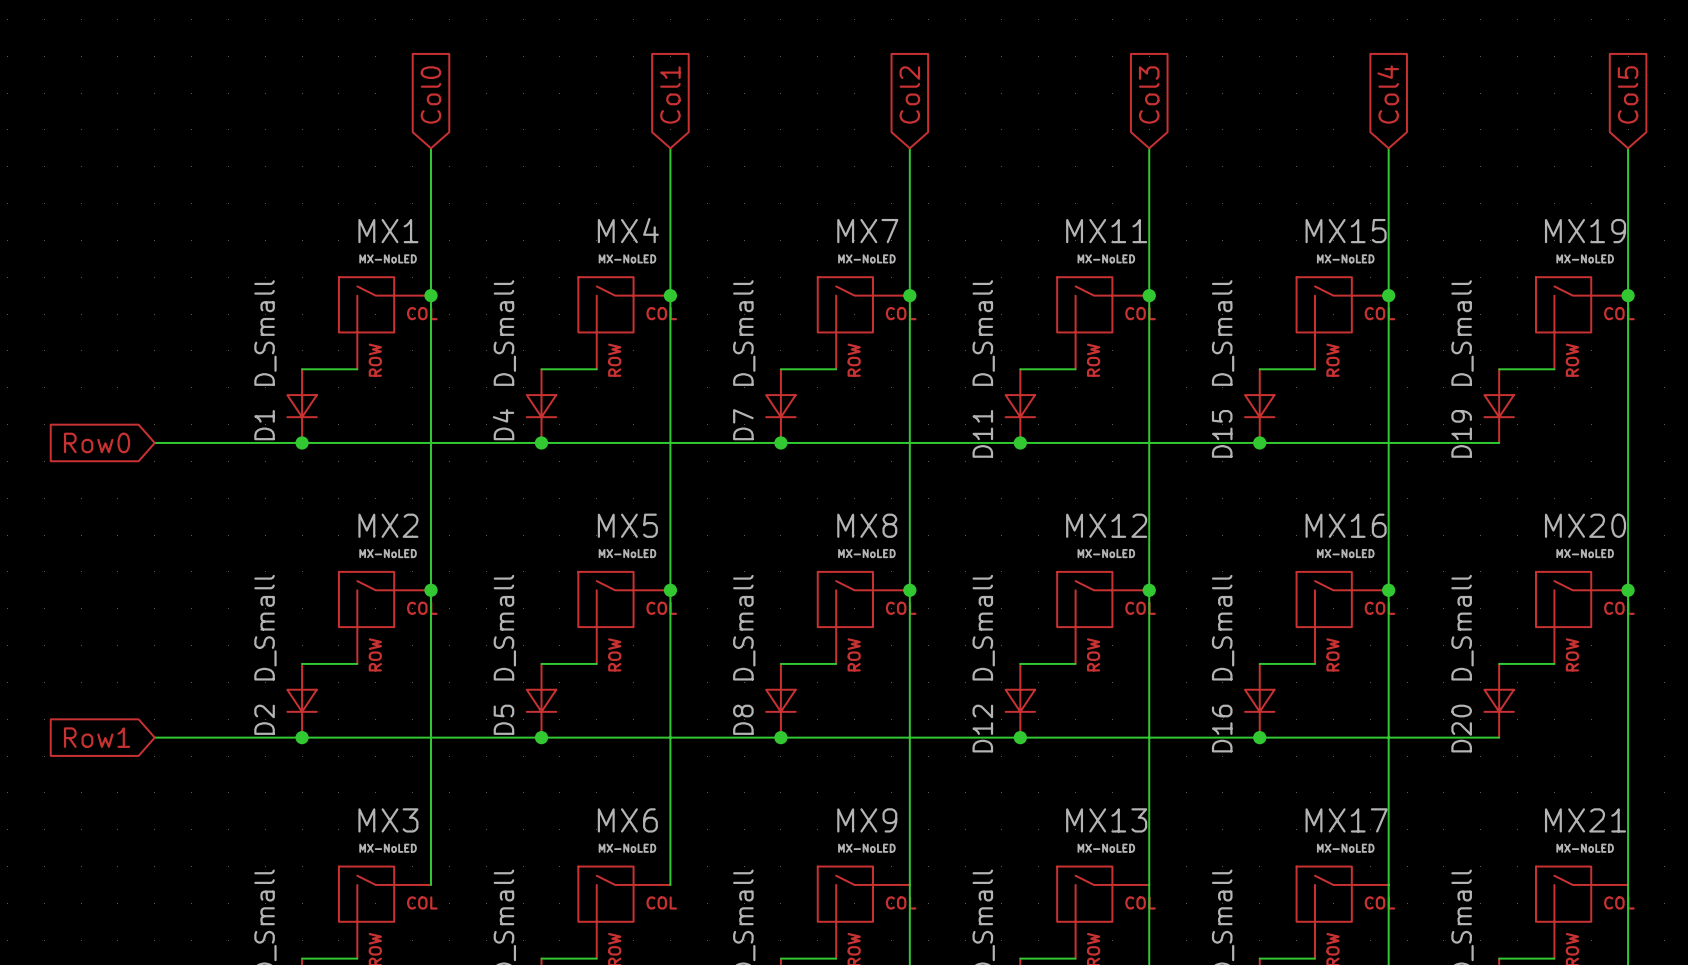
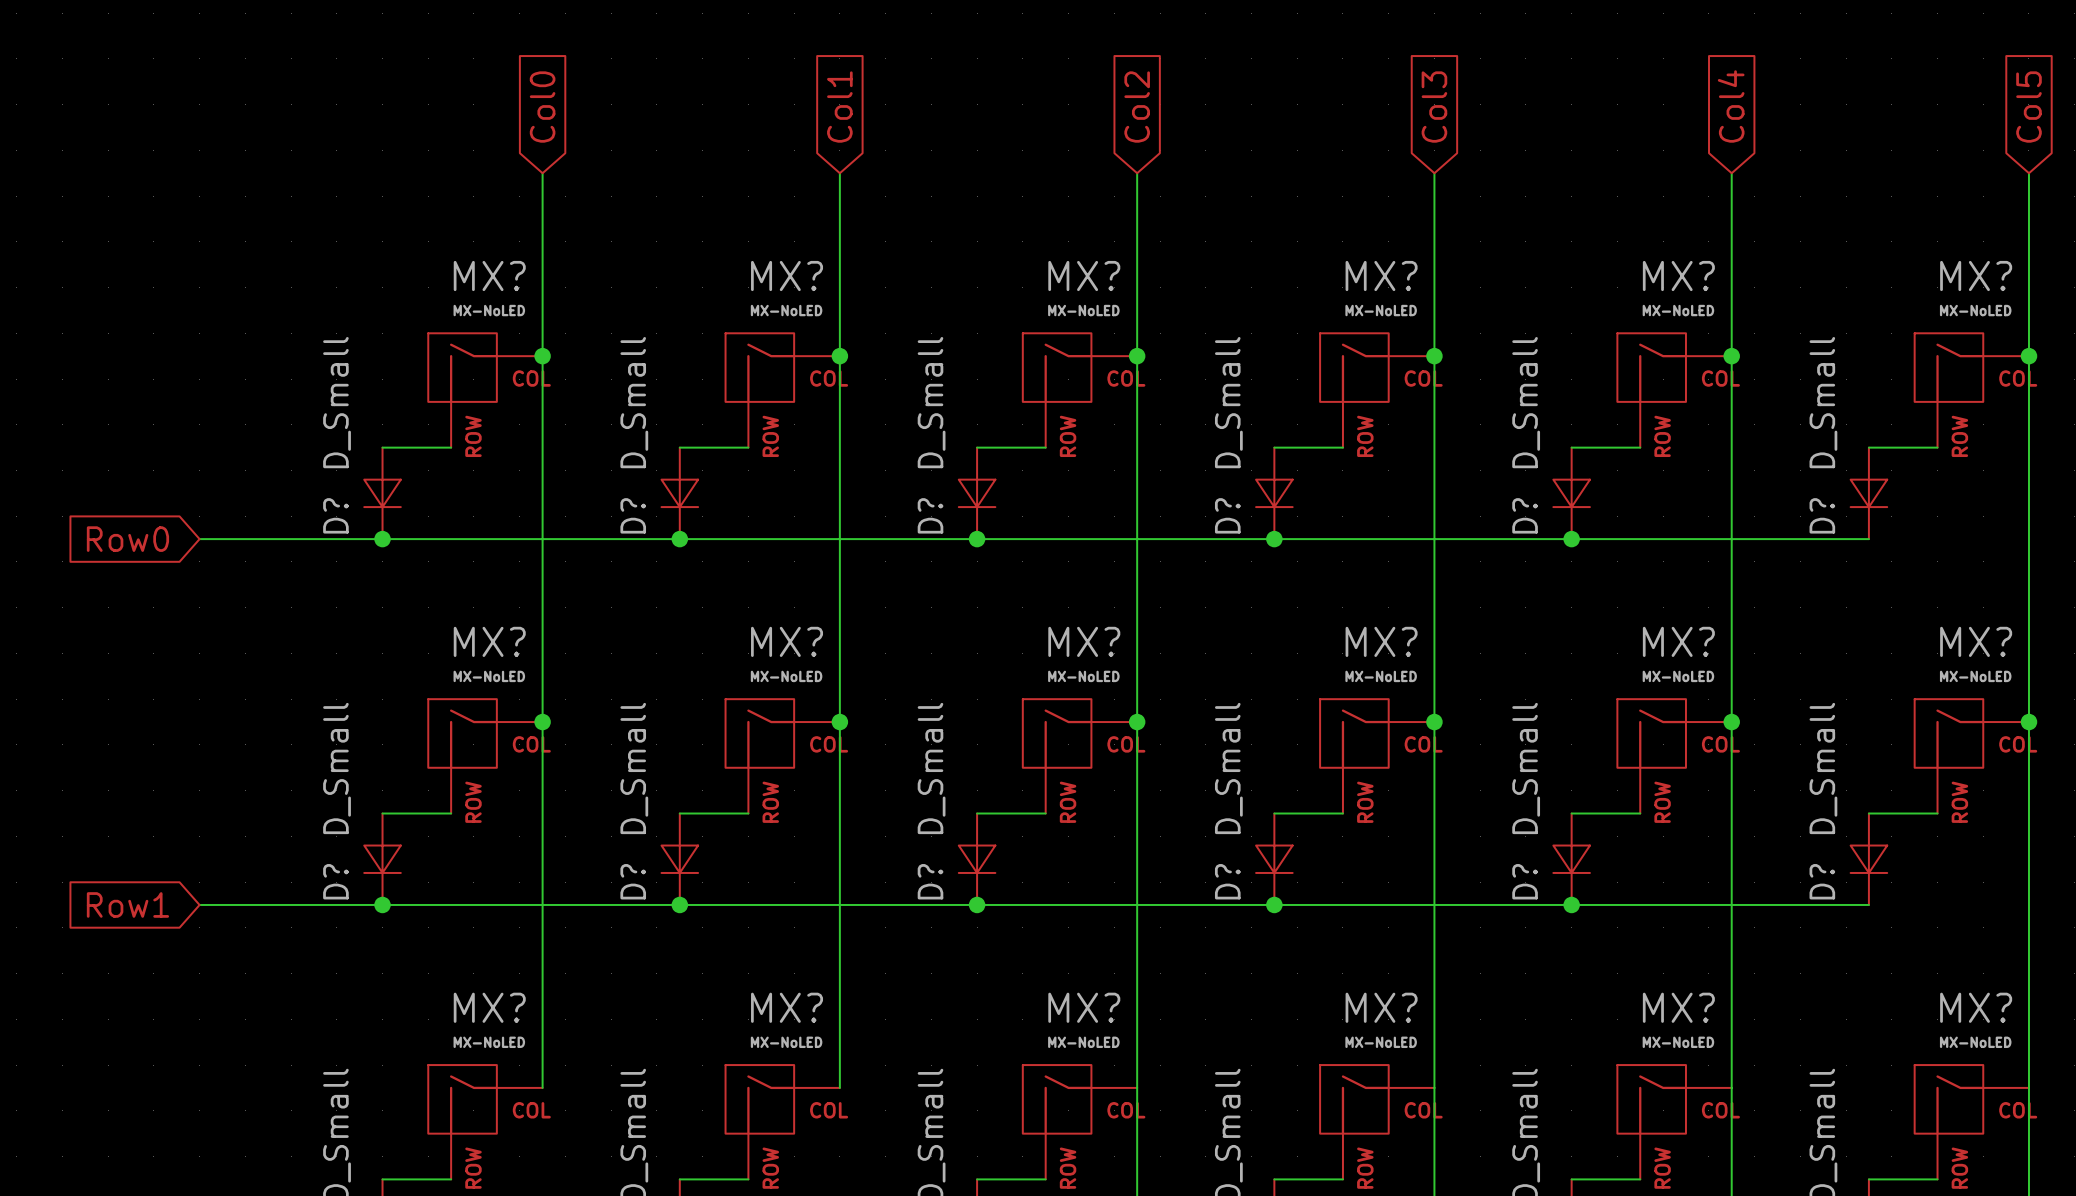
MX4 name: MX4 (628, 230) -> MX? (787, 276)
MX1 name: MX1 (388, 231) -> MX? (489, 276)
MX7 name: MX7 (867, 231) -> MX? (1084, 276)
MX11 name: MX11 (1106, 231) -> MX? (1381, 276)
MX15 name: MX15 (1346, 231) -> MX? (1678, 276)
MX19 name: MX19 (1585, 231) -> MX? (1976, 276)
D4 name: D4 (503, 424) -> D? (633, 515)
D7 name: D7 (743, 424) -> D? (930, 515)
D1 name: D1 (264, 425) -> D? (335, 515)
D11 name: D11 (982, 433) -> D? (1227, 515)
D15 name: D15 (1222, 433) -> D? (1525, 515)
D19 name: D19 (1461, 433) -> D? (1822, 515)
MX2 name: MX2 (388, 525) -> MX? (489, 641)
MX5 name: MX5 (627, 525) -> MX? (787, 641)
MX8 name: MX8 (867, 525) -> MX? (1084, 641)
MX12 name: MX12 (1106, 525) -> MX? (1381, 641)
MX16 name: MX16 (1346, 525) -> MX? (1678, 641)
MX20 name: MX20 (1585, 525) -> MX? (1976, 641)
D2 name: D2 (264, 719) -> D? (335, 881)
D5 name: D5 (503, 719) -> D? (633, 881)
D8 name: D8 (743, 719) -> D? (930, 881)
D12 name: D12 (982, 728) -> D? (1227, 881)
D16 name: D16 (1222, 728) -> D? (1525, 881)
D20 name: D20 (1461, 728) -> D? (1822, 881)
MX3 name: MX3 (388, 820) -> MX? (489, 1007)
MX6 name: MX6 (627, 820) -> MX? (787, 1007)
MX9 name: MX9 (867, 820) -> MX? (1084, 1007)
MX13 name: MX13 (1106, 820) -> MX? (1381, 1007)
MX17 name: MX17 (1346, 820) -> MX? (1678, 1007)
MX21 name: MX21 (1585, 820) -> MX? (1976, 1007)

